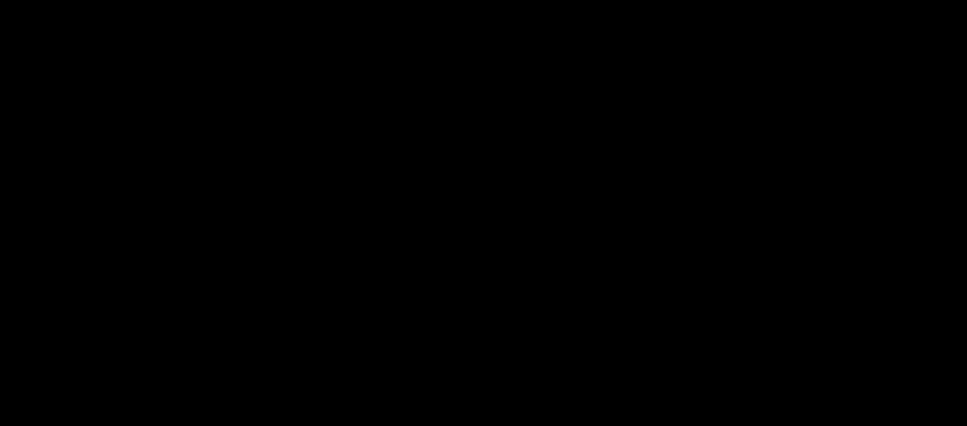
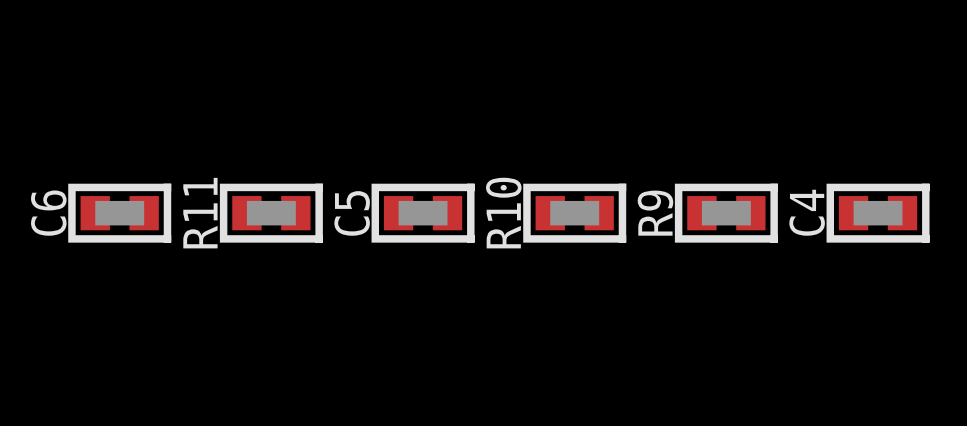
C6: none -> (119, 213)
R11: none -> (271, 213)
C5: none -> (423, 213)
R10: none -> (574, 213)
R9: none -> (726, 213)
C4: none -> (878, 213)

